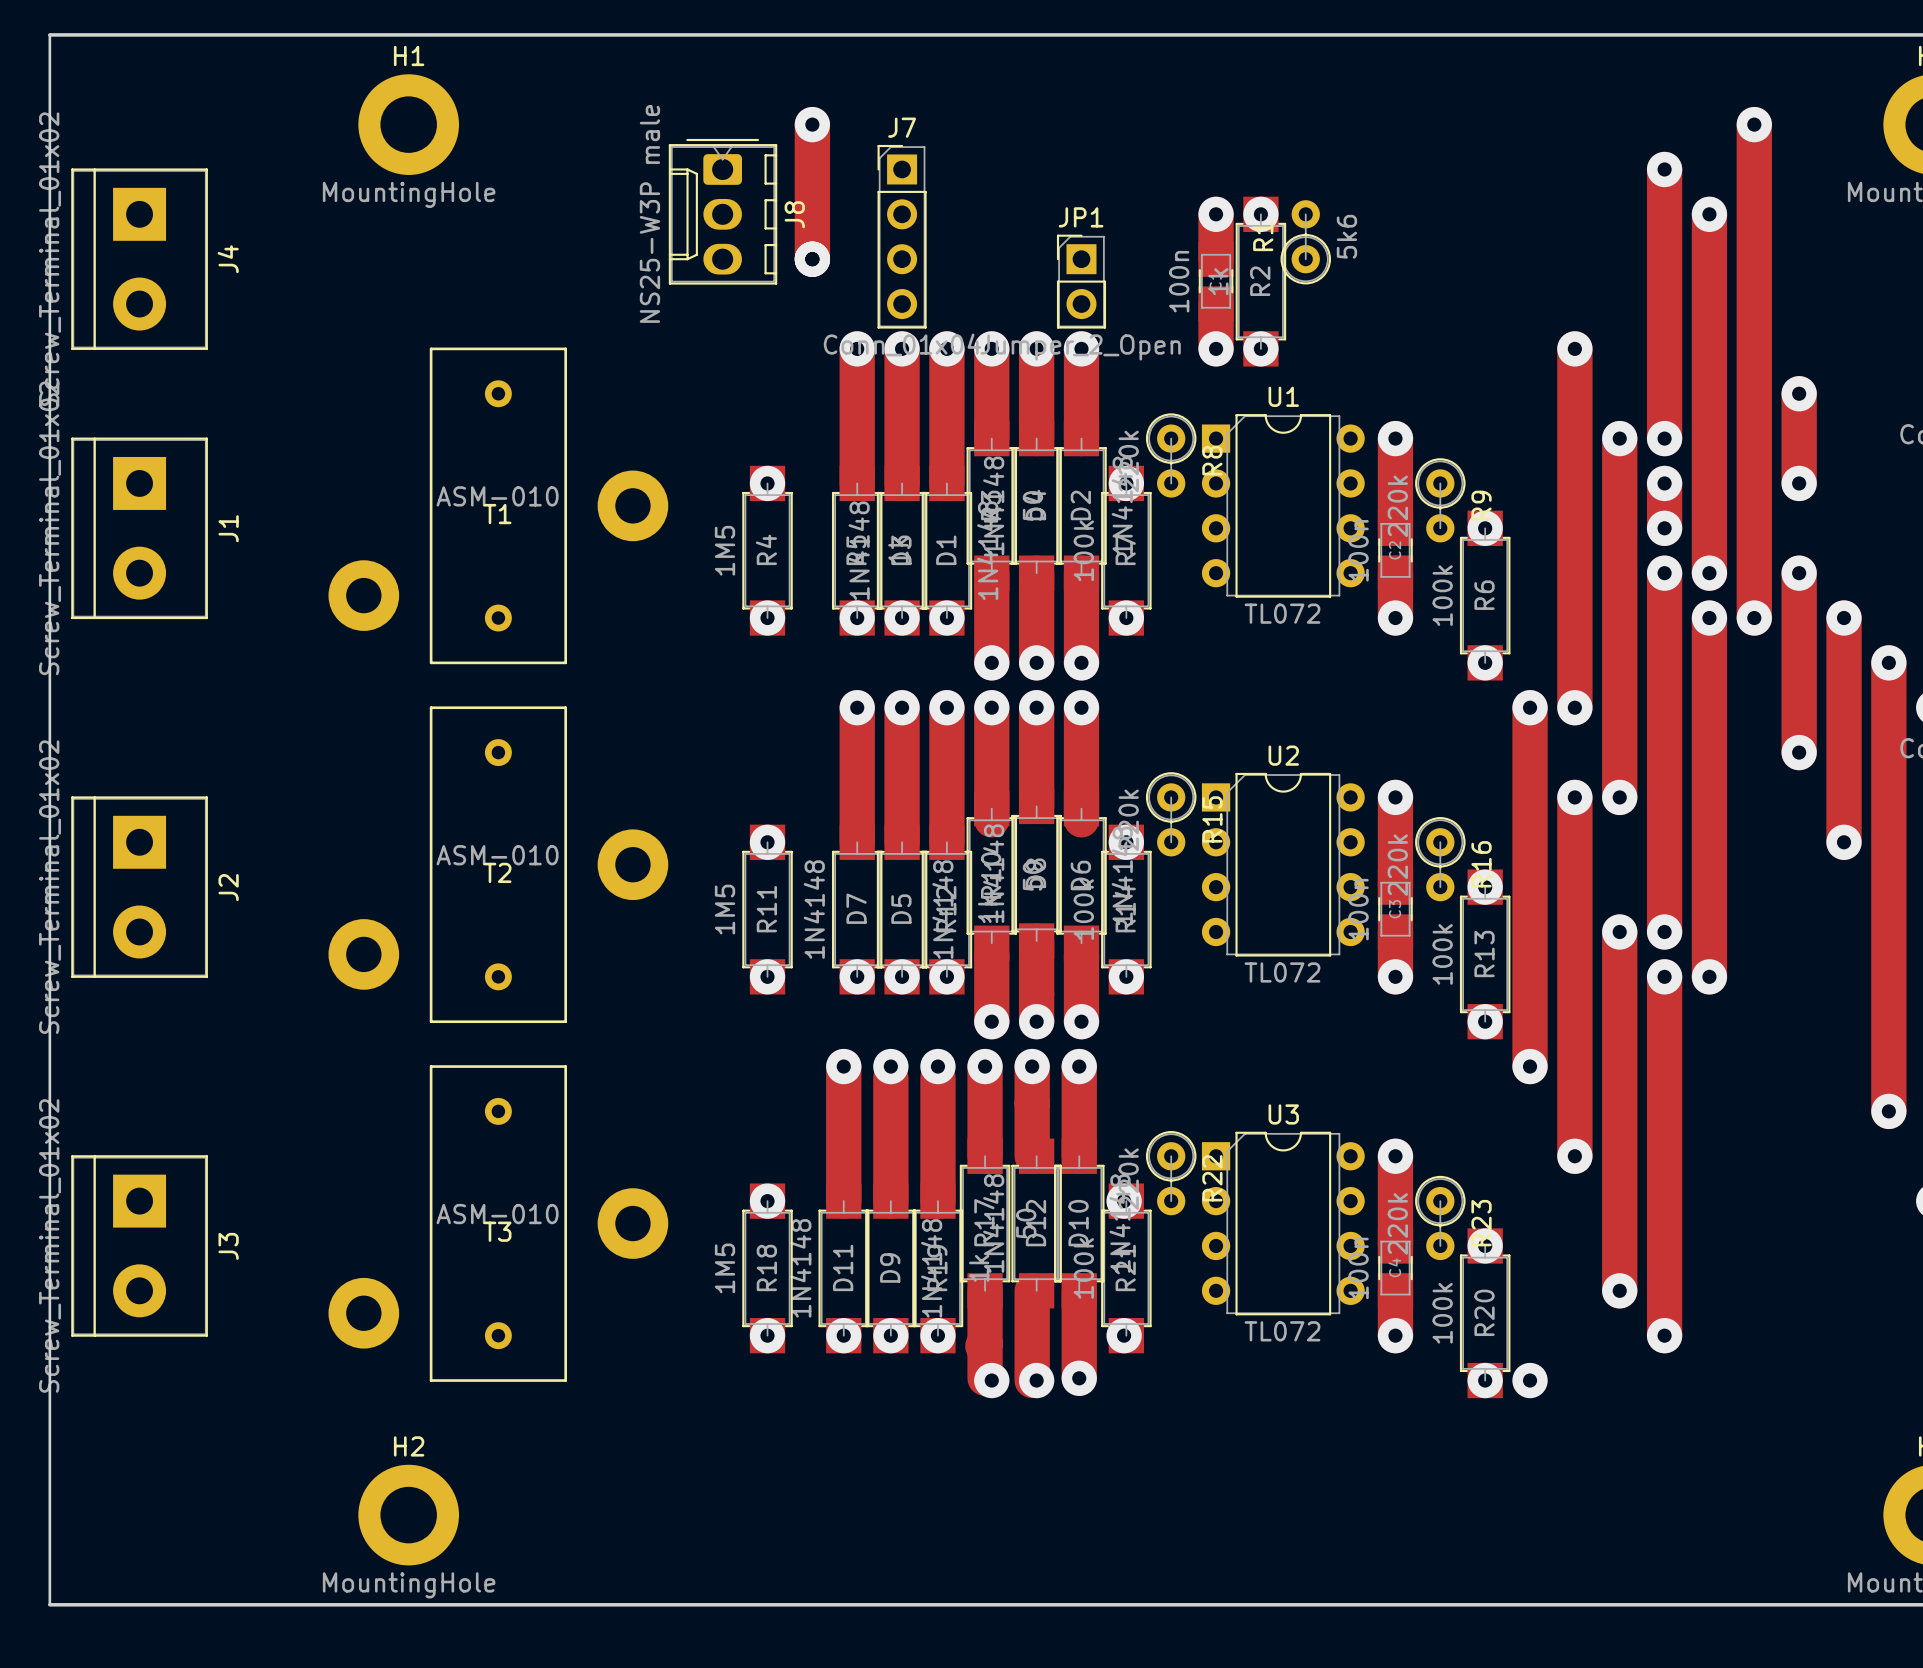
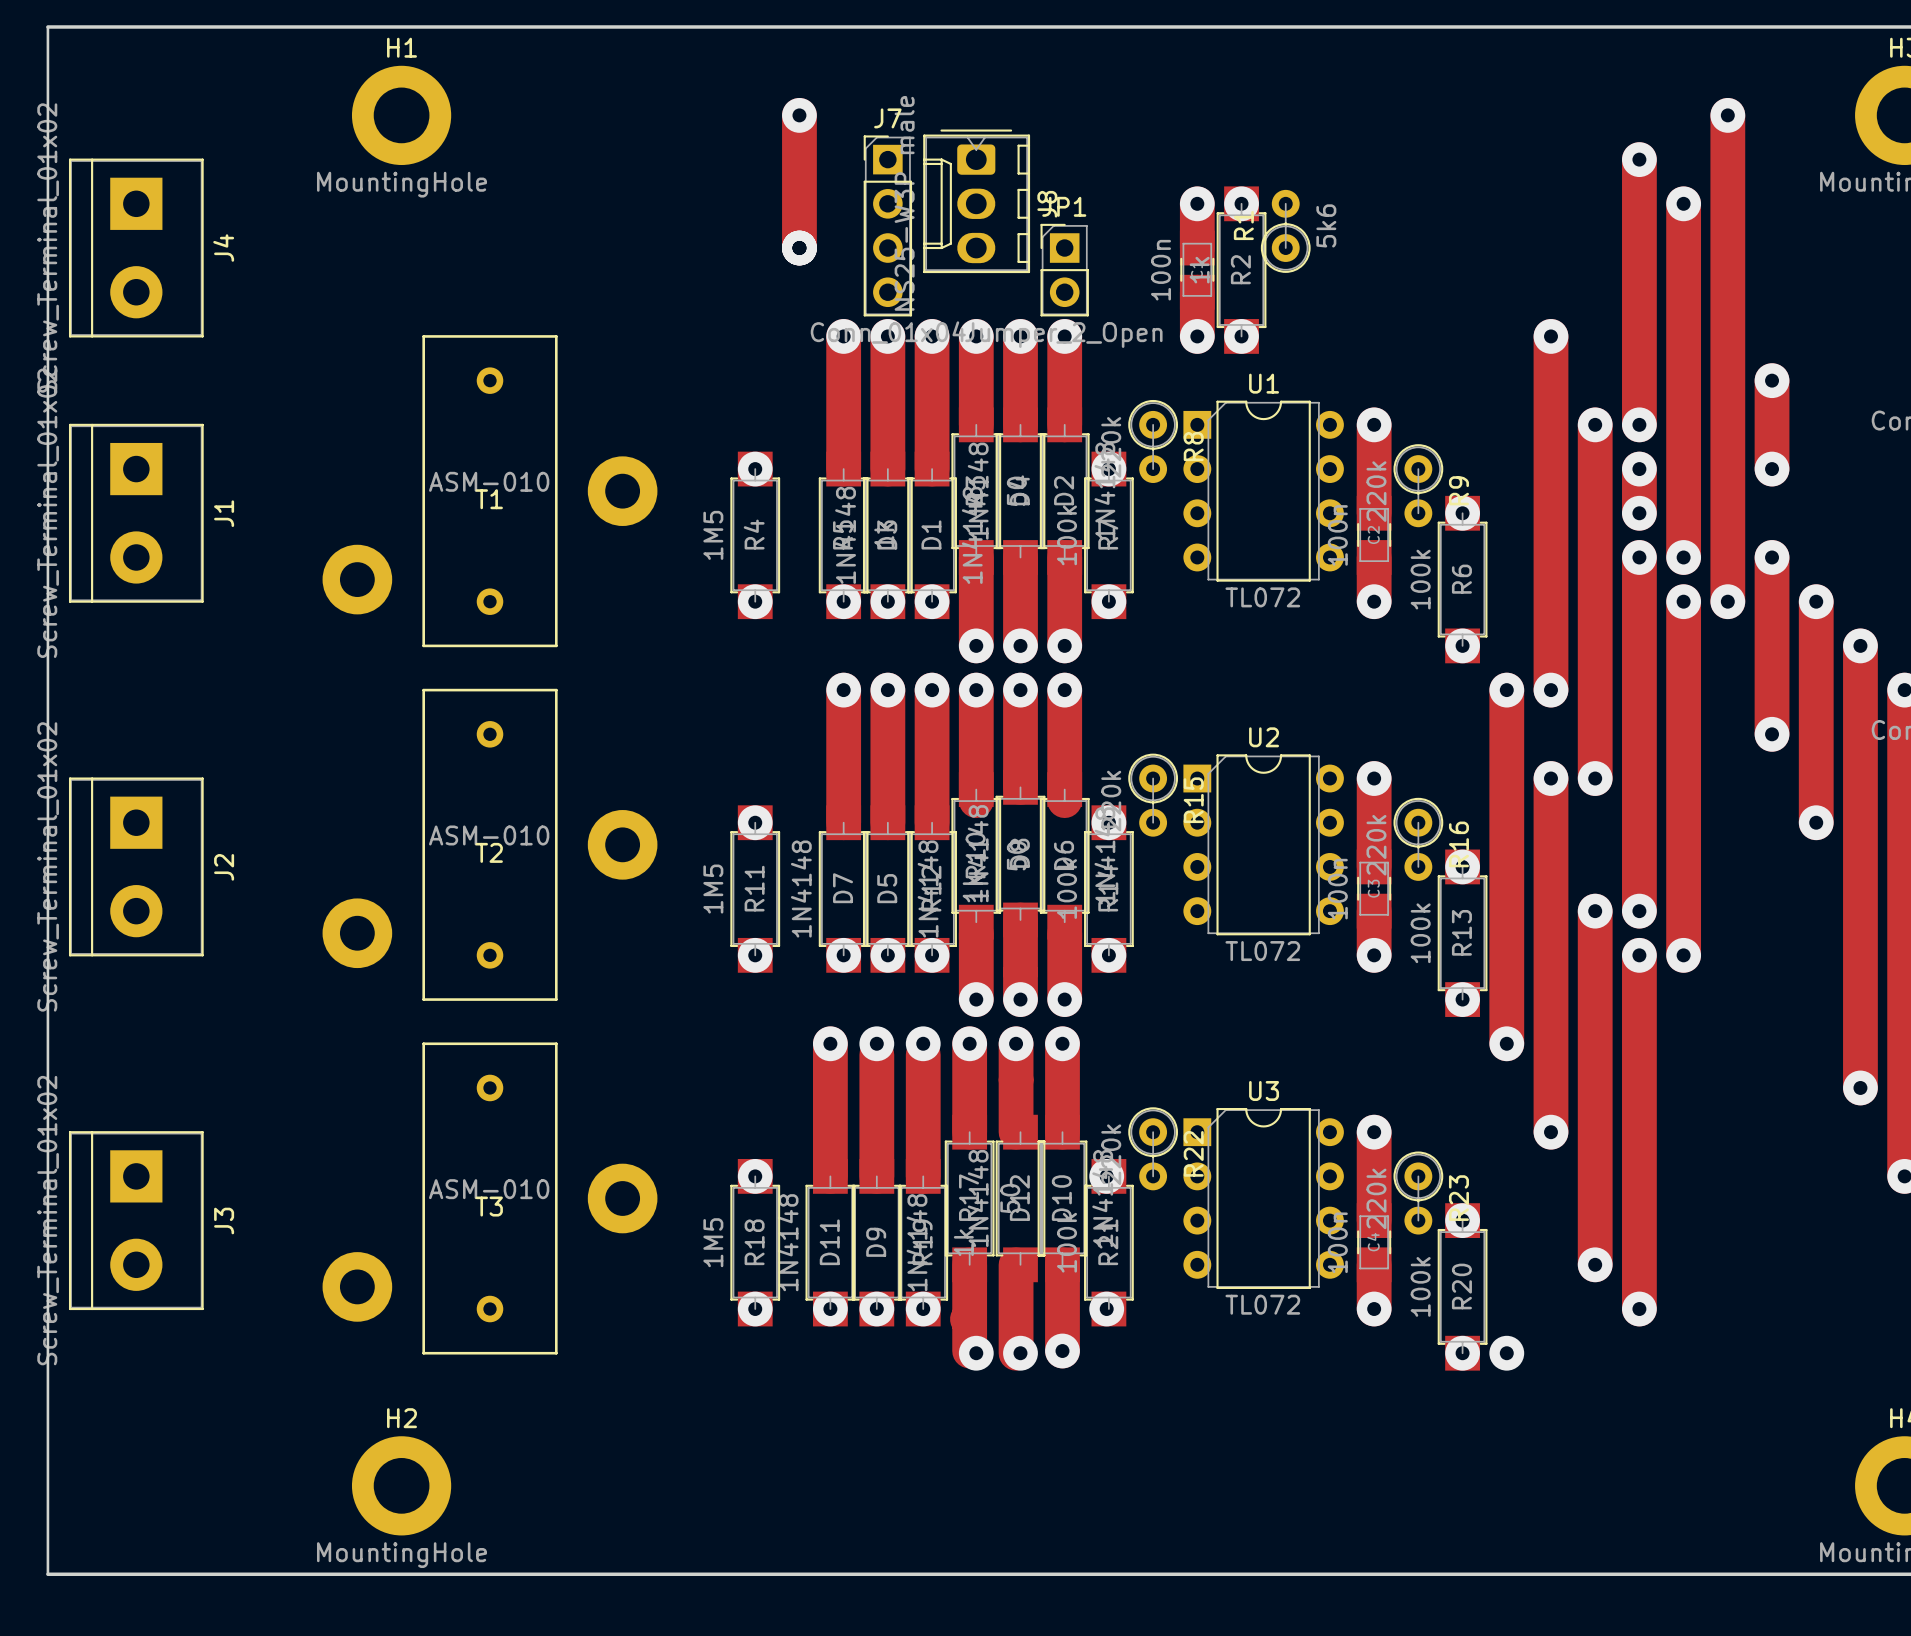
J8 position: (723, 211) -> (976, 201)

